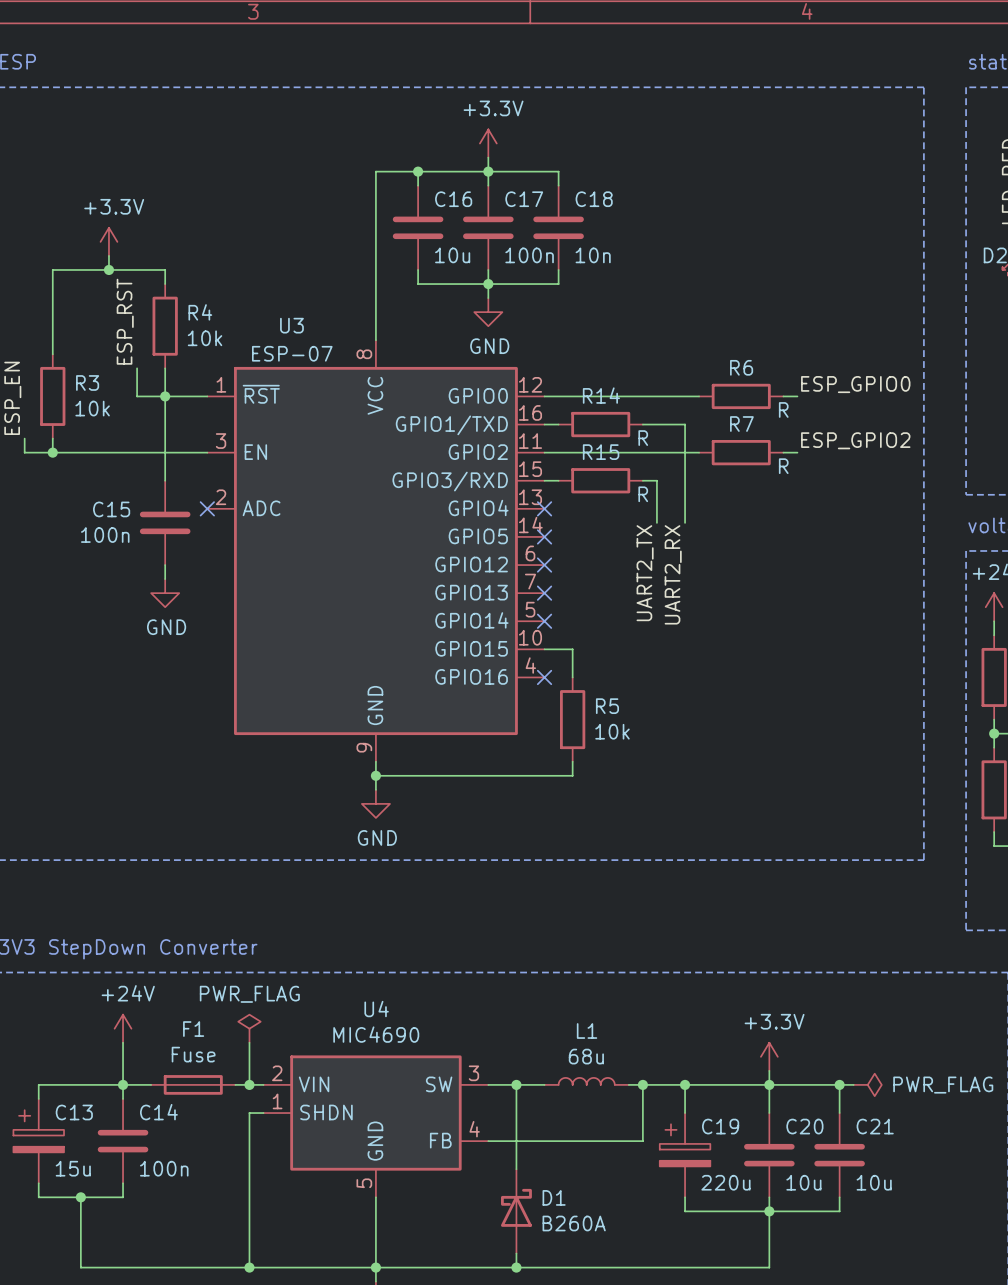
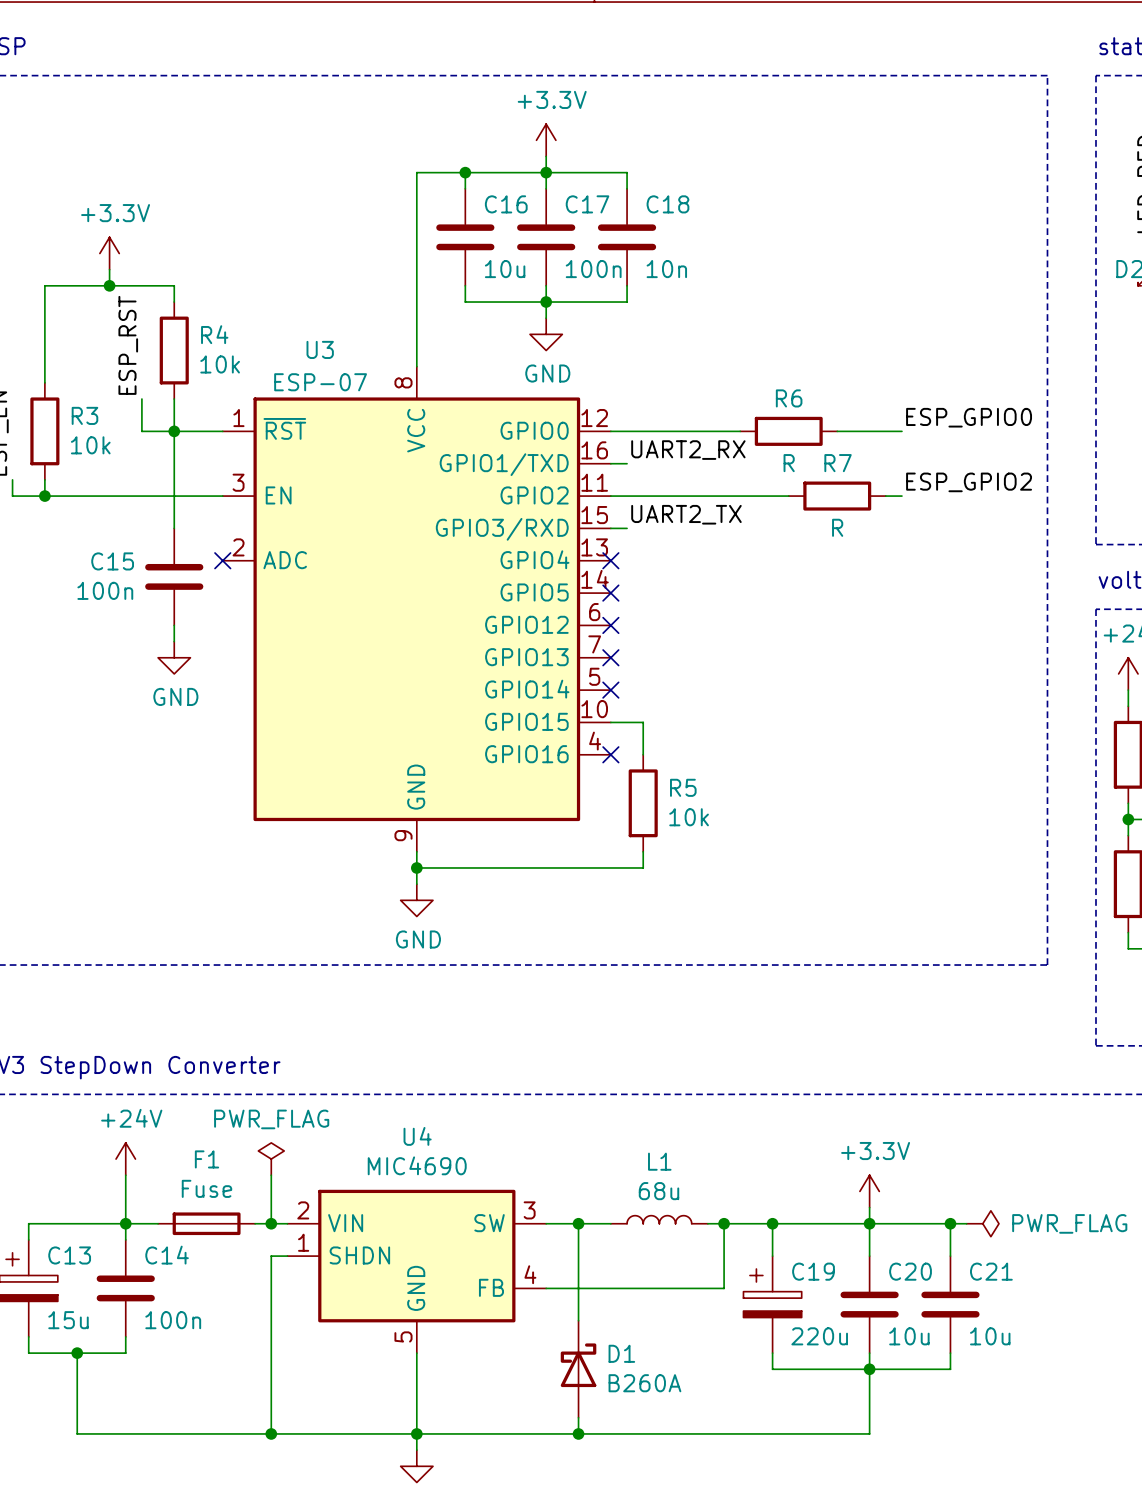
wire: (656, 396) (699, 396) -> (837, 431) (885, 431)
R6 position: (741, 396) -> (788, 431)
R6 value position: R (783, 409) -> R (789, 463)
R14: R (600, 424) -> none
wire: (642, 424) (685, 424) (685, 522) -> none
R7 value position: R (783, 466) -> R (837, 527)
R15: R (600, 480) -> none
wire: (642, 480) (656, 480) (656, 522) -> none
label rotation: 0° (645, 573) -> 90° clockwise (686, 514)
label rotation: 0° (673, 574) -> 90° clockwise (688, 450)
label position: UART2_RX (673, 574) -> UART2_RX (688, 450)

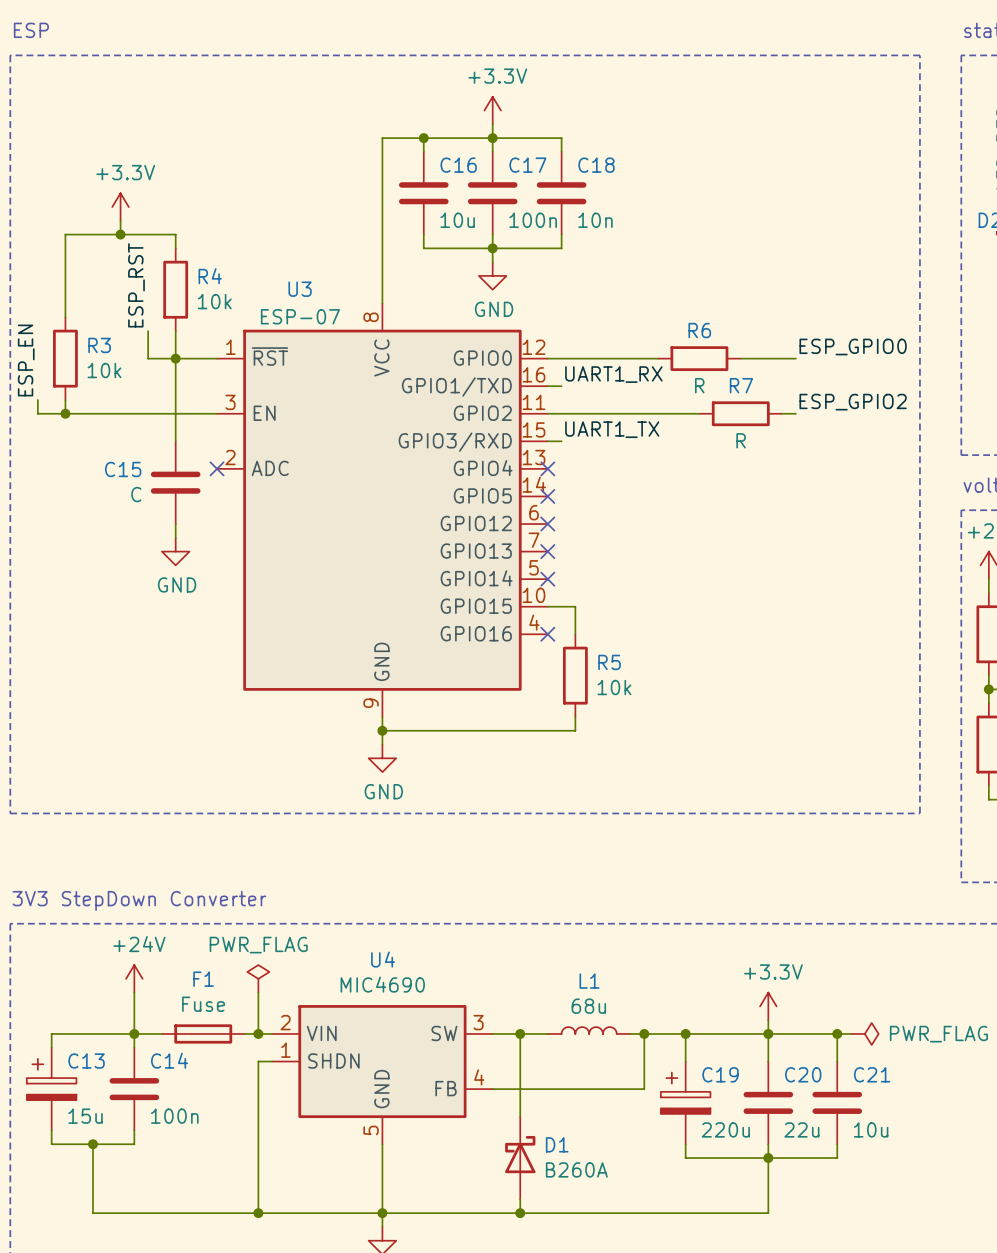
label: UART2_RX (688, 450) -> UART1_RX (613, 374)
label: UART2_TX (686, 514) -> UART1_TX (612, 429)
C15 value: 100n (105, 590) -> C (136, 494)
C20 value: 10u (909, 1336) -> 22u (801, 1129)

